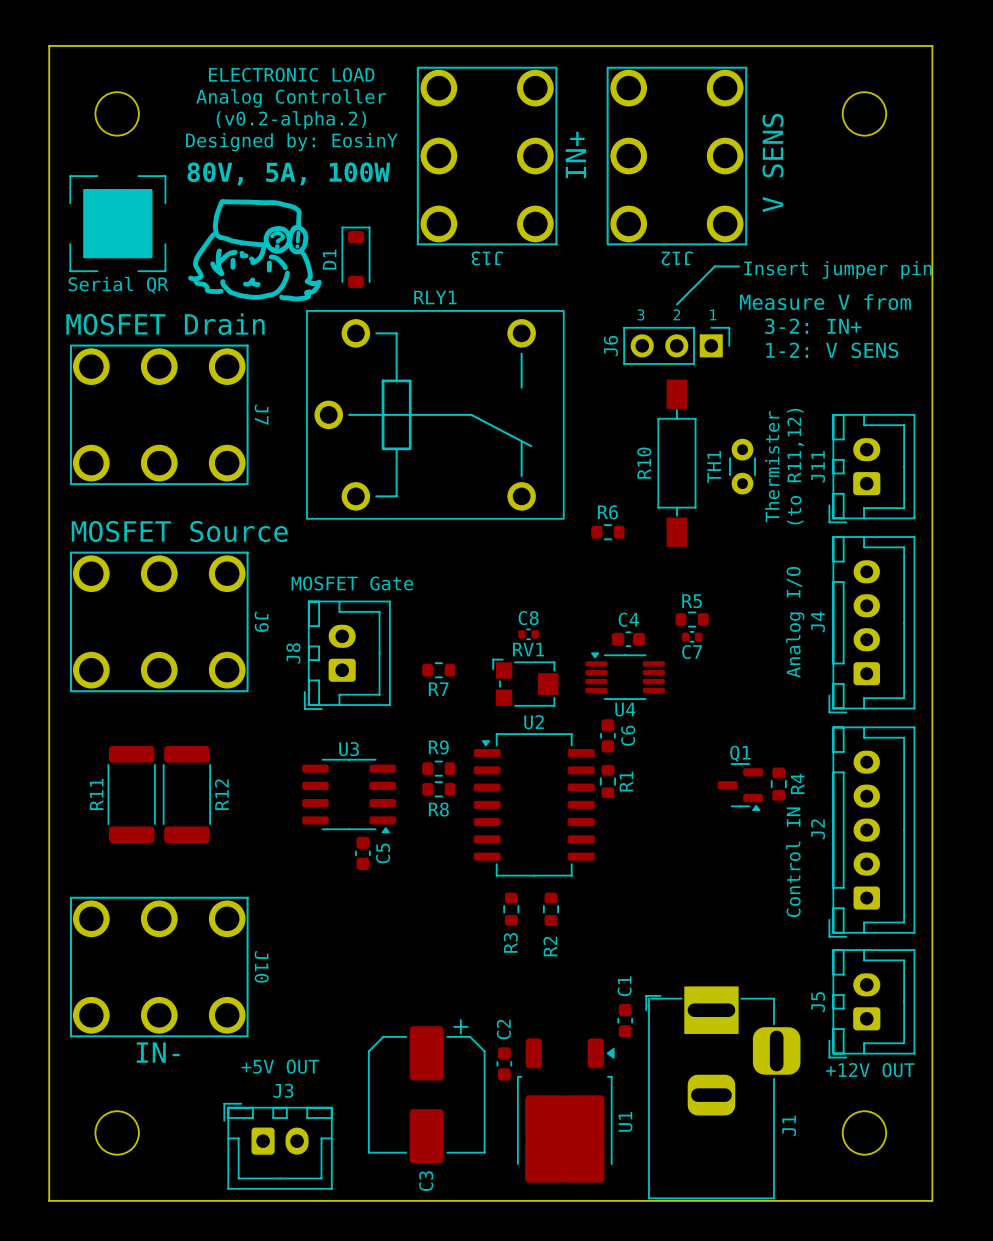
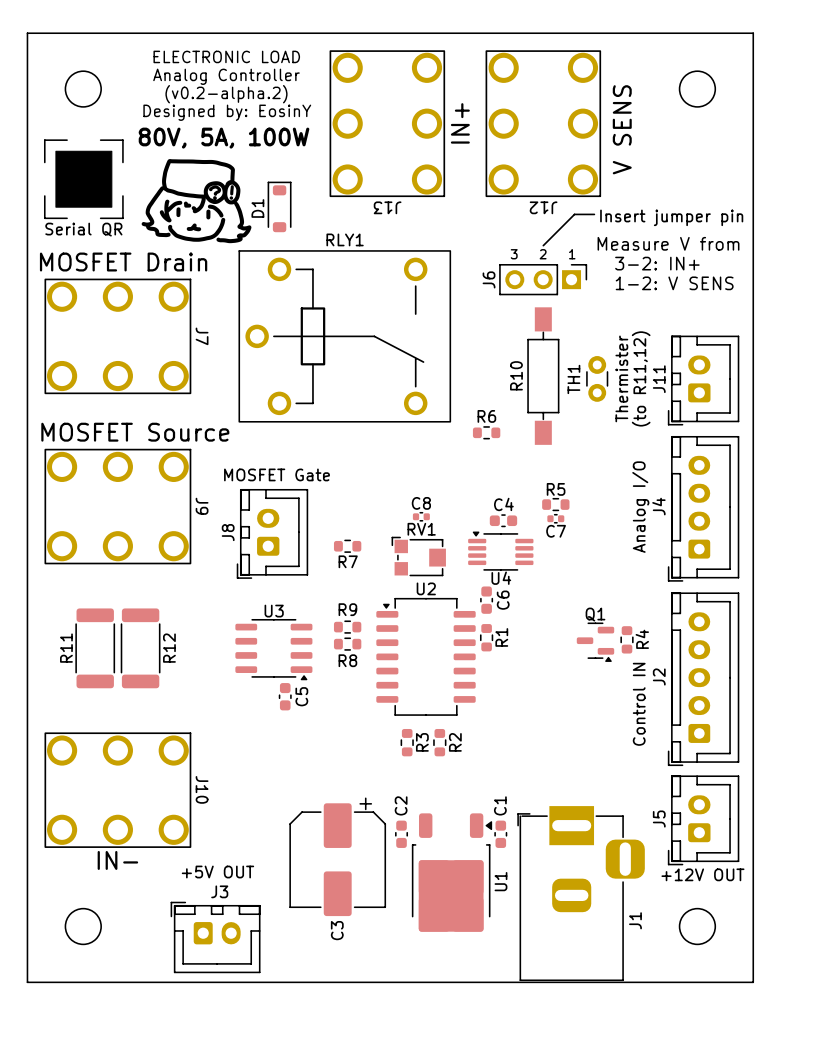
R3 name position: R3 (510, 942) -> R3 (422, 742)
R2 name position: R2 (550, 946) -> R2 (455, 742)
C2 position: (504, 1063) -> (401, 834)
C3 position: (426, 1091) -> (337, 856)
U1 position: (565, 1110) -> (452, 872)

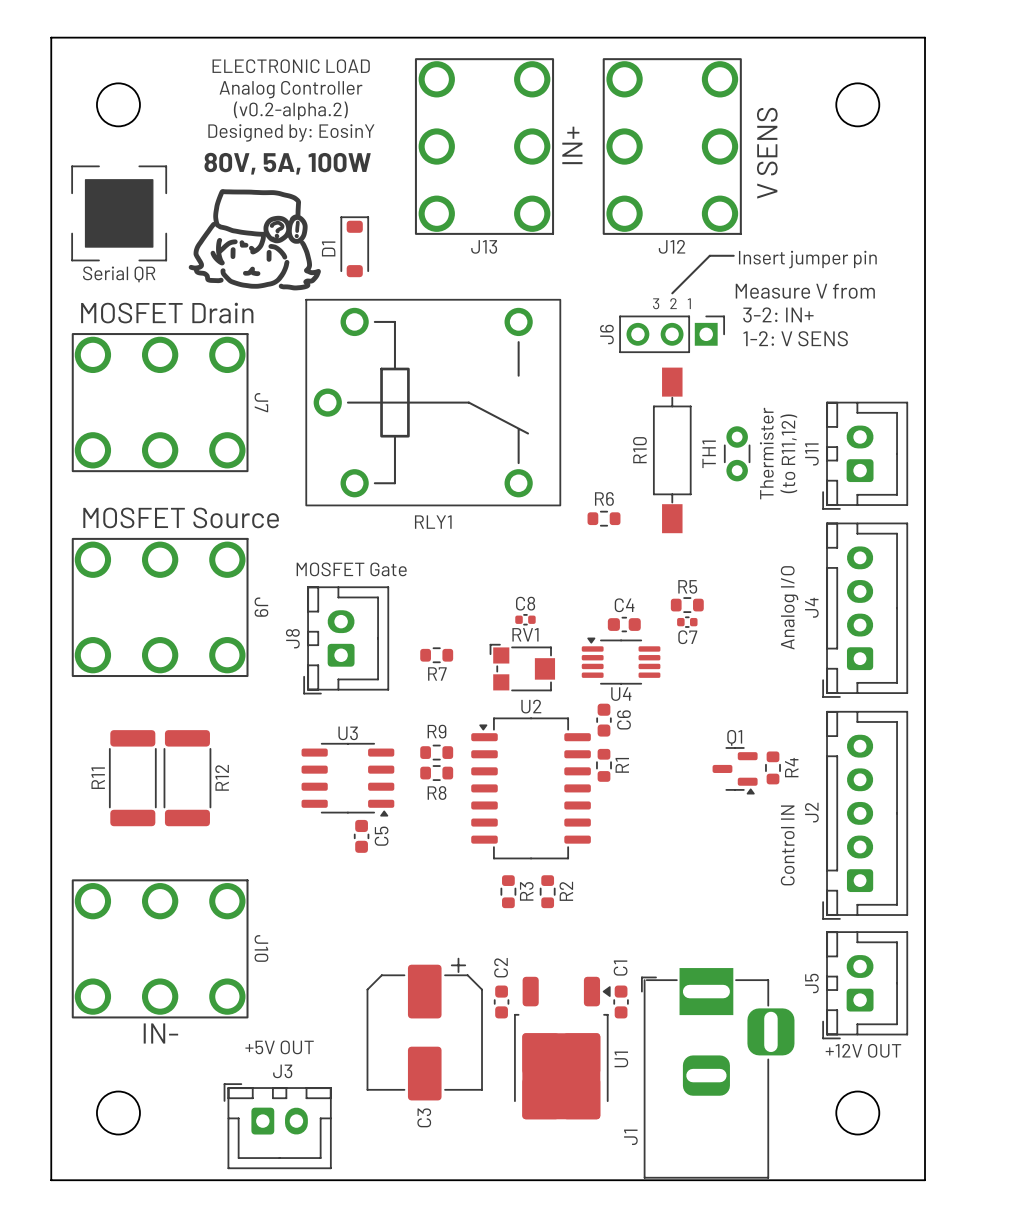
J13 name rotation: 0° (387, 207) -> 180° (484, 246)
J12 name rotation: 0° (543, 207) -> 180° (672, 246)
RLY1 name position: RLY1 (345, 239) -> RLY1 (433, 522)
J1 name position: J1 (635, 920) -> J1 (630, 1137)

